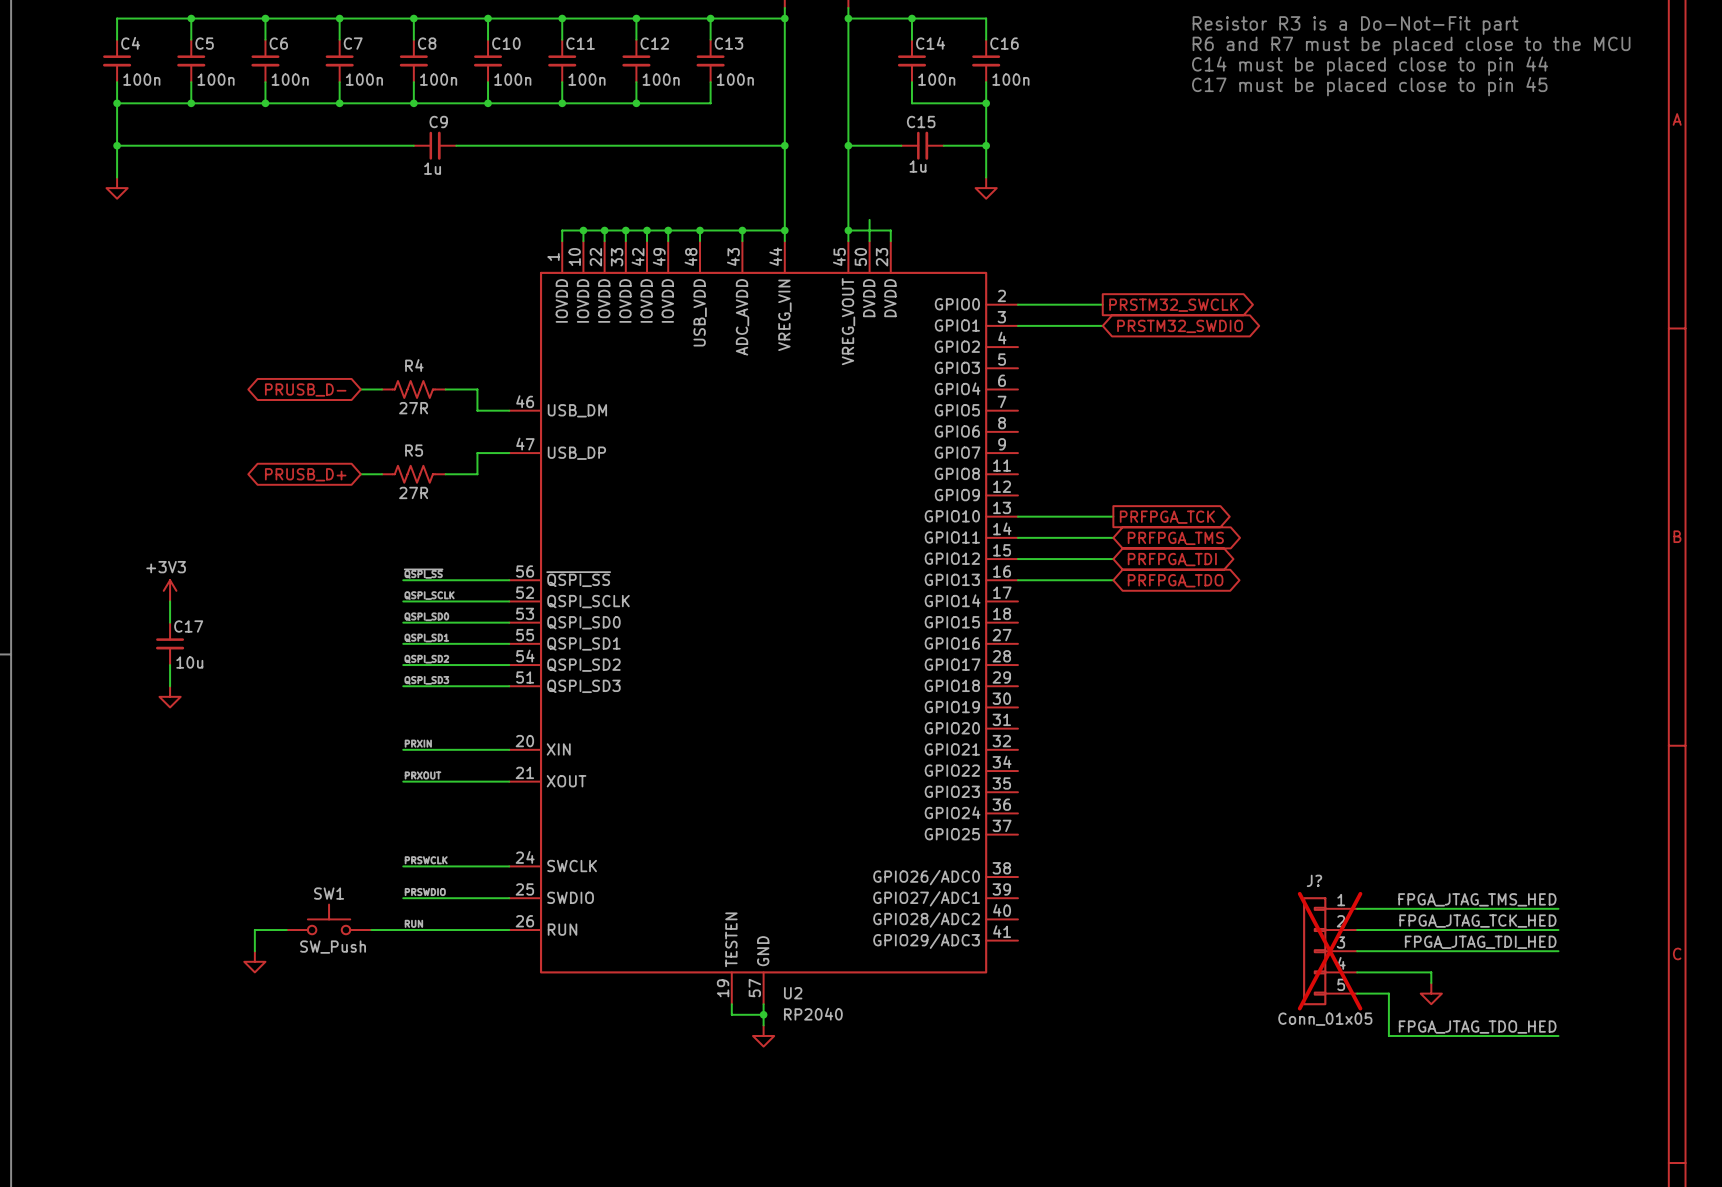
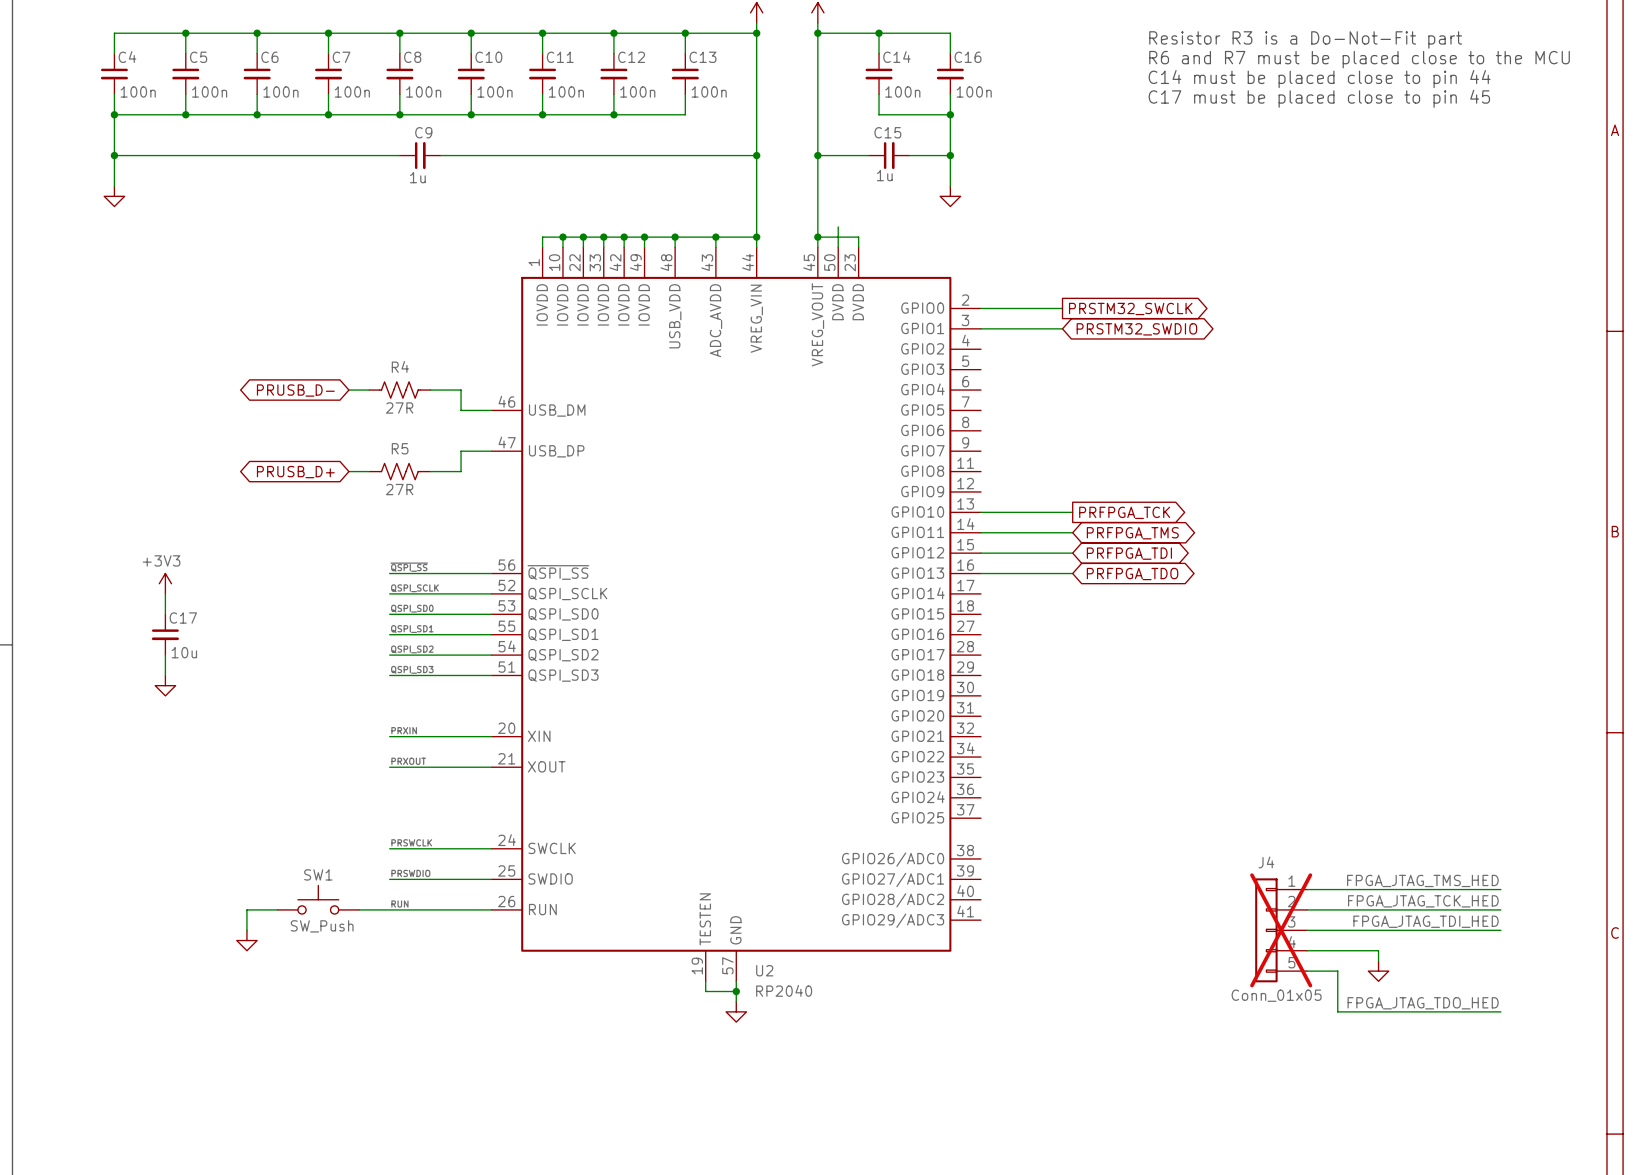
J? name: J? (1314, 880) -> J4 (1266, 862)

